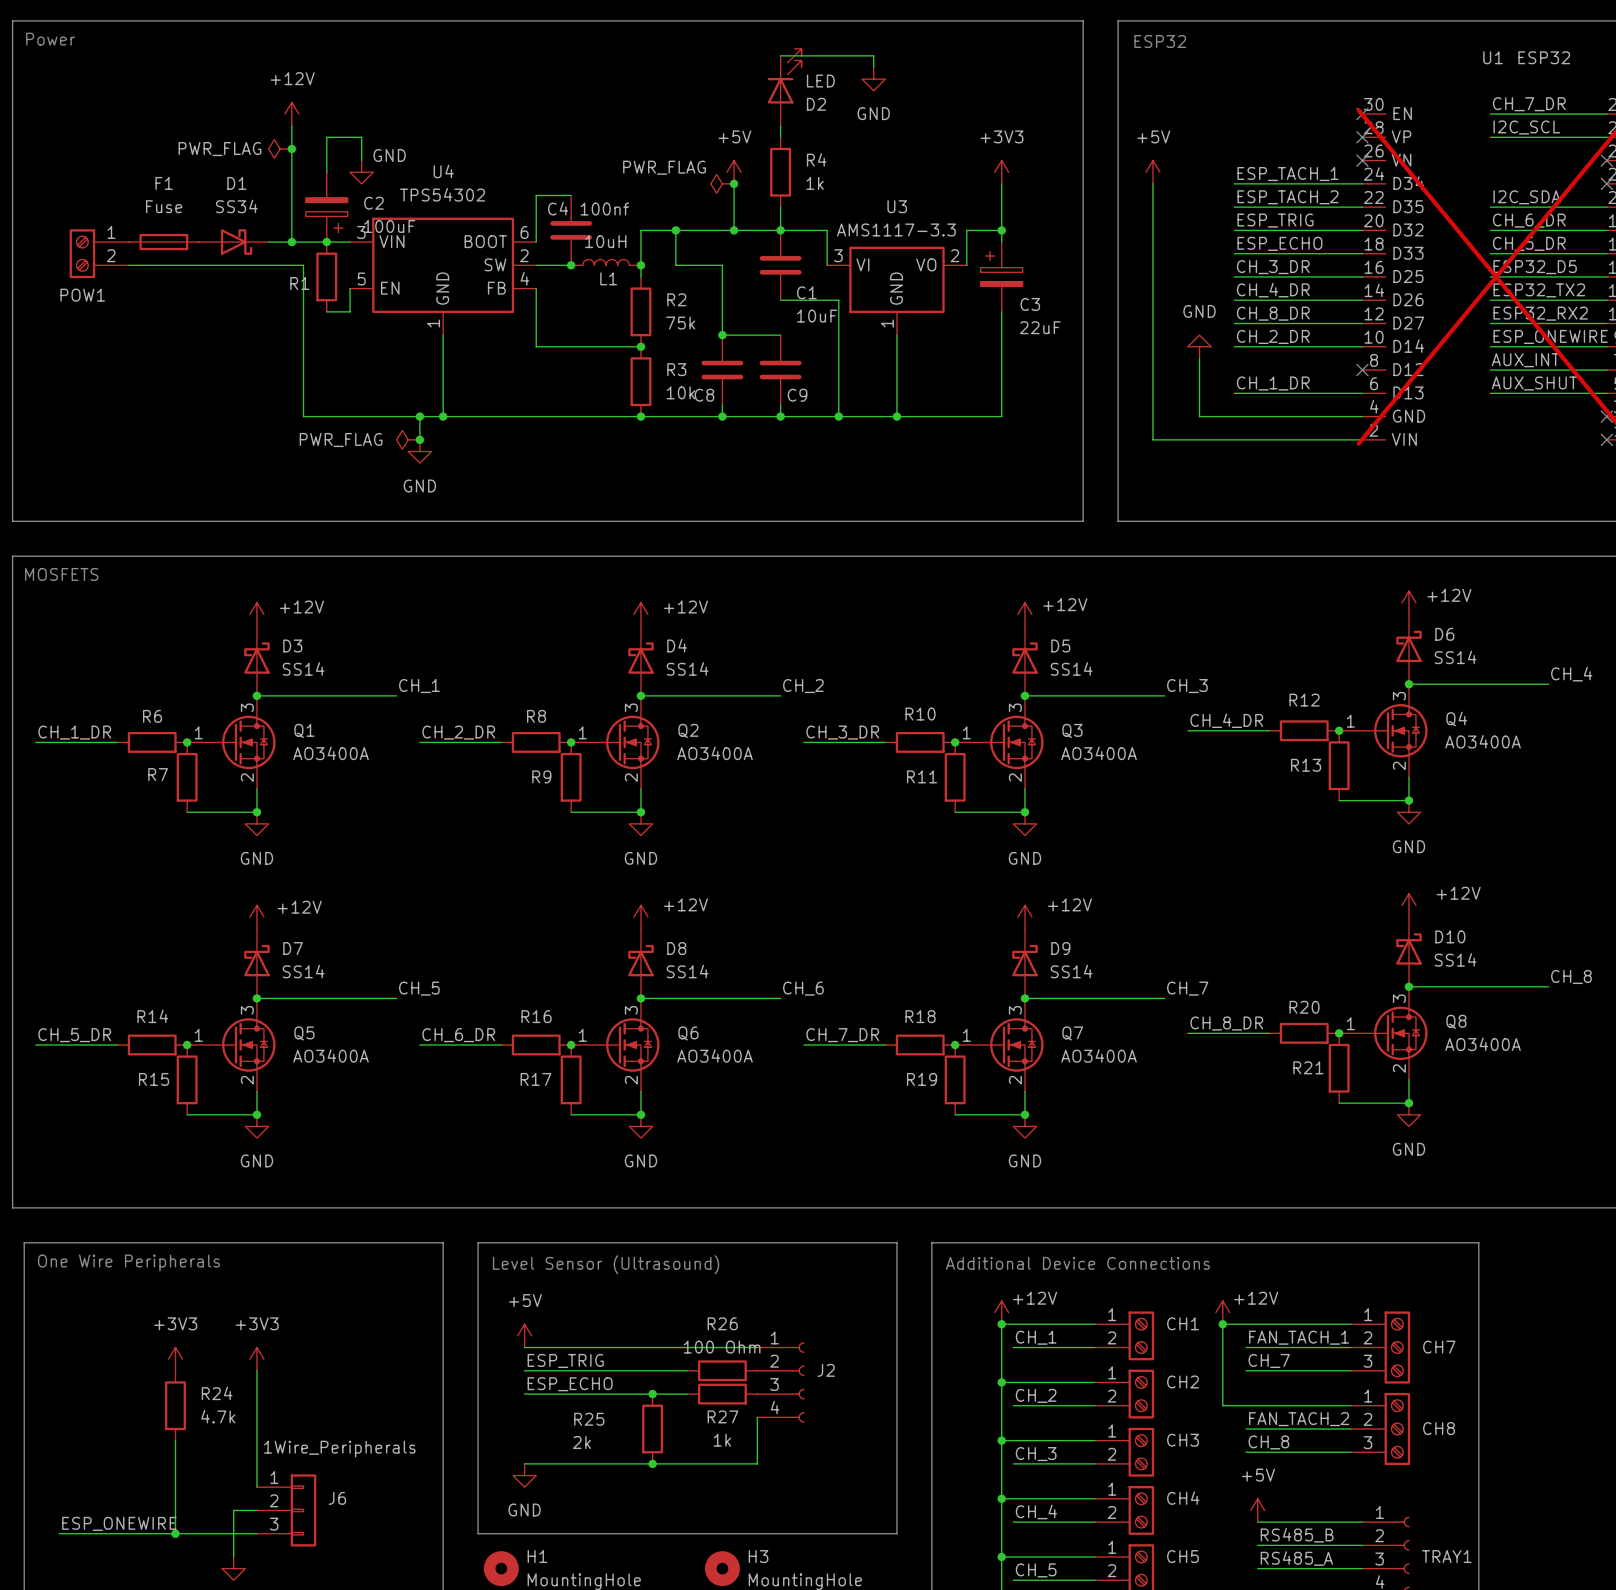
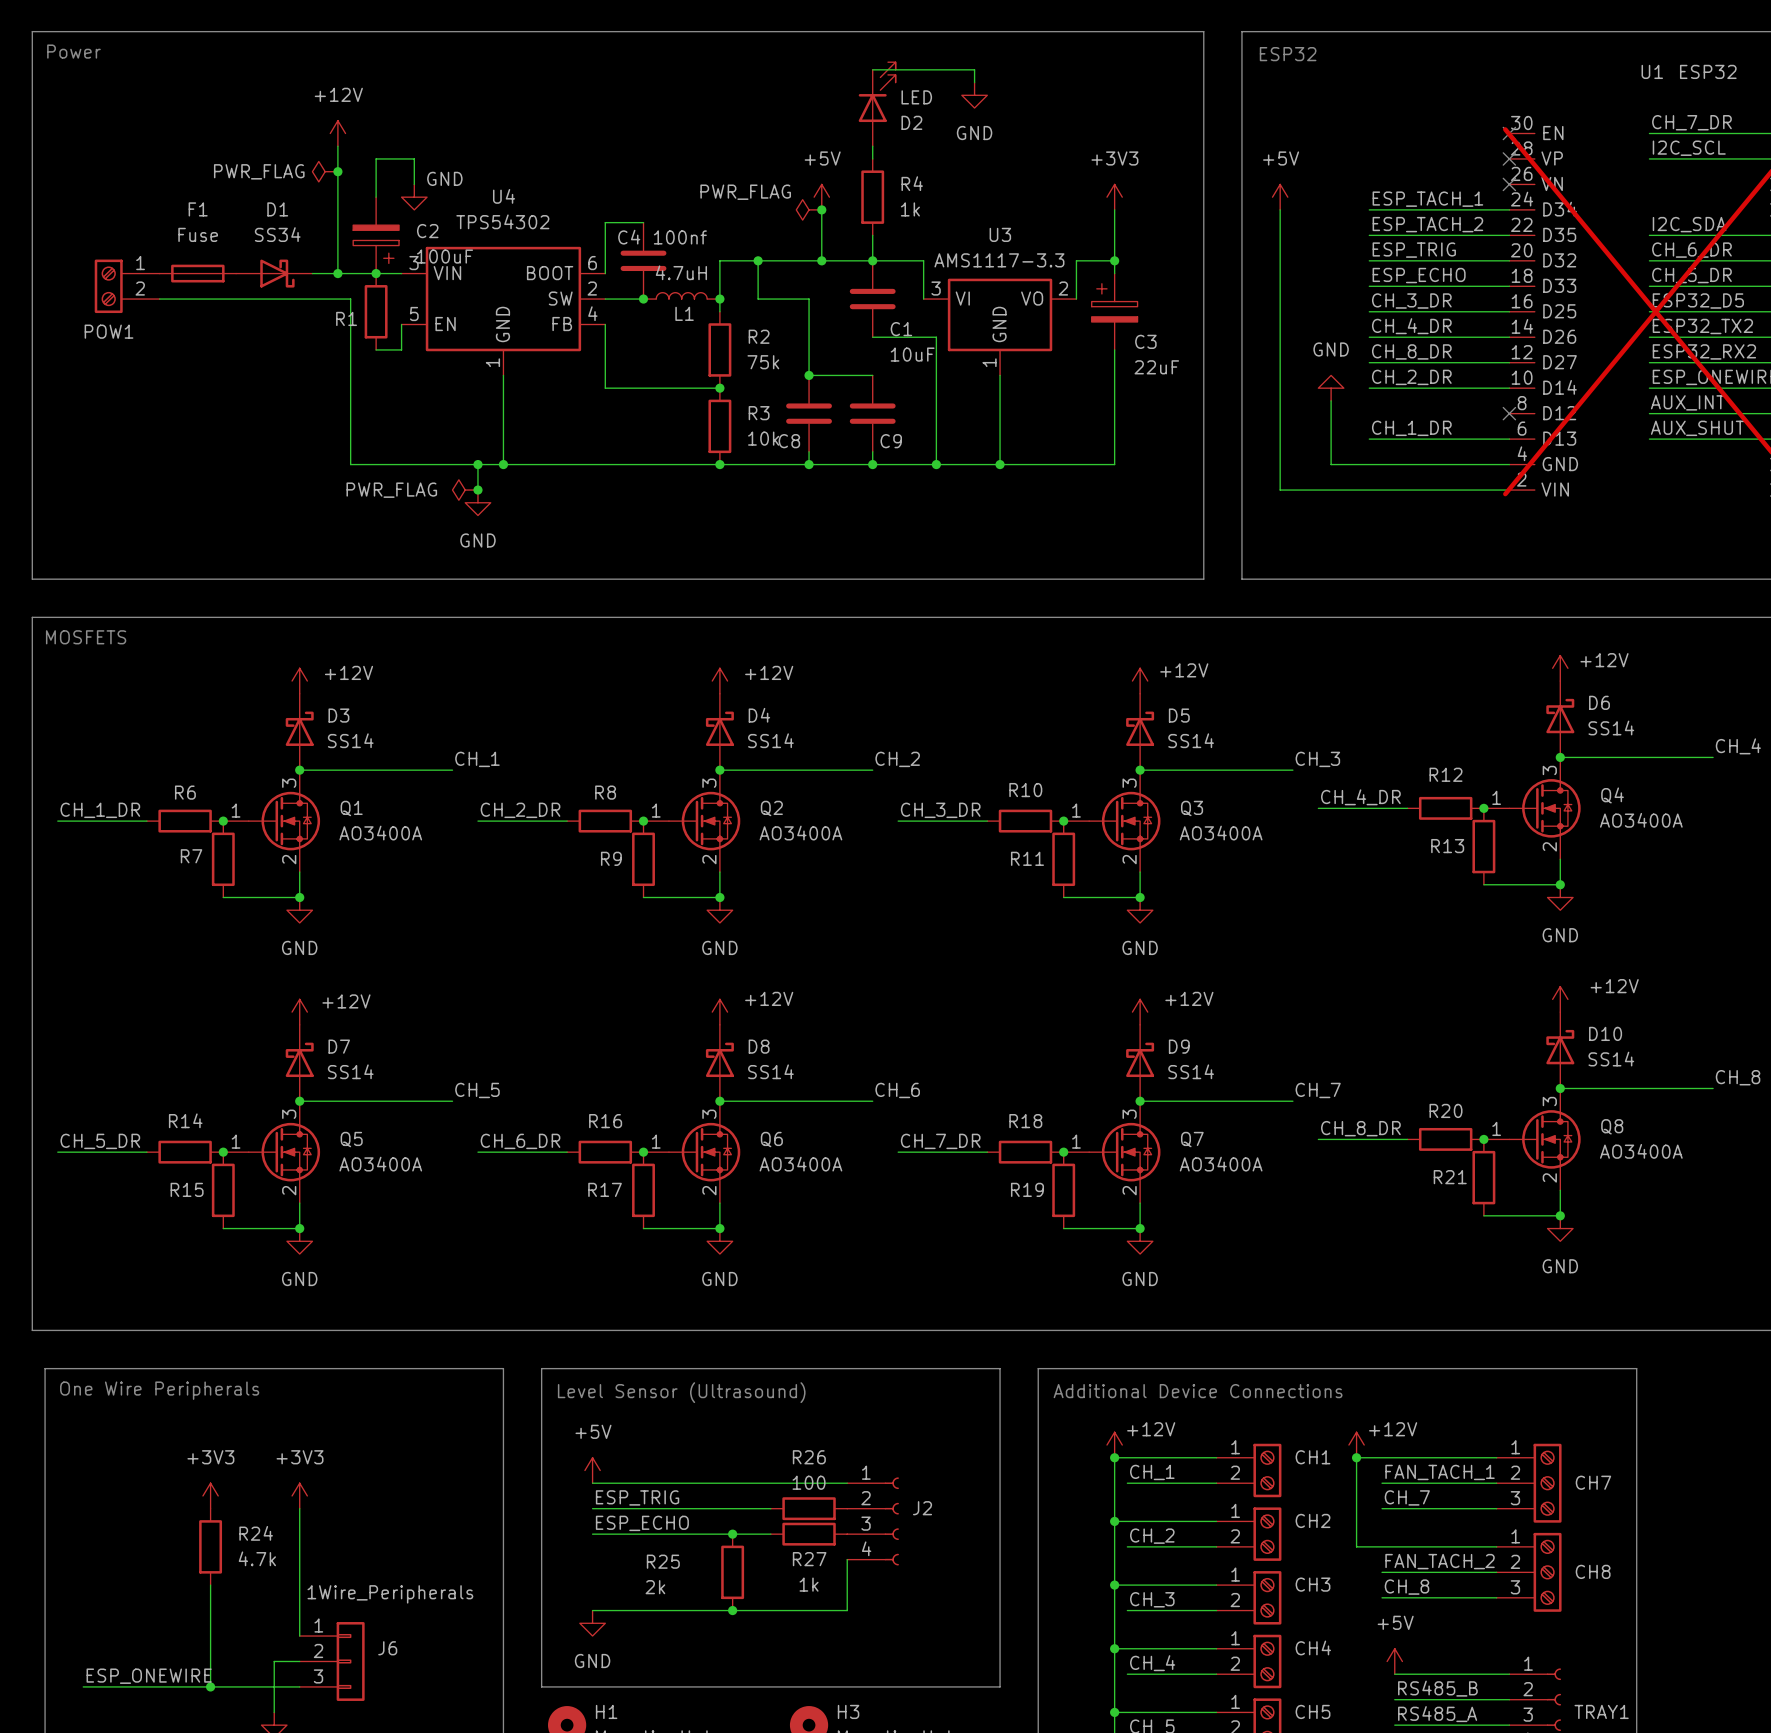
L1 value: 10uH (605, 241) -> 4.7uH (681, 272)
R26 value: 100 Ohm (722, 1347) -> 100 (809, 1482)

